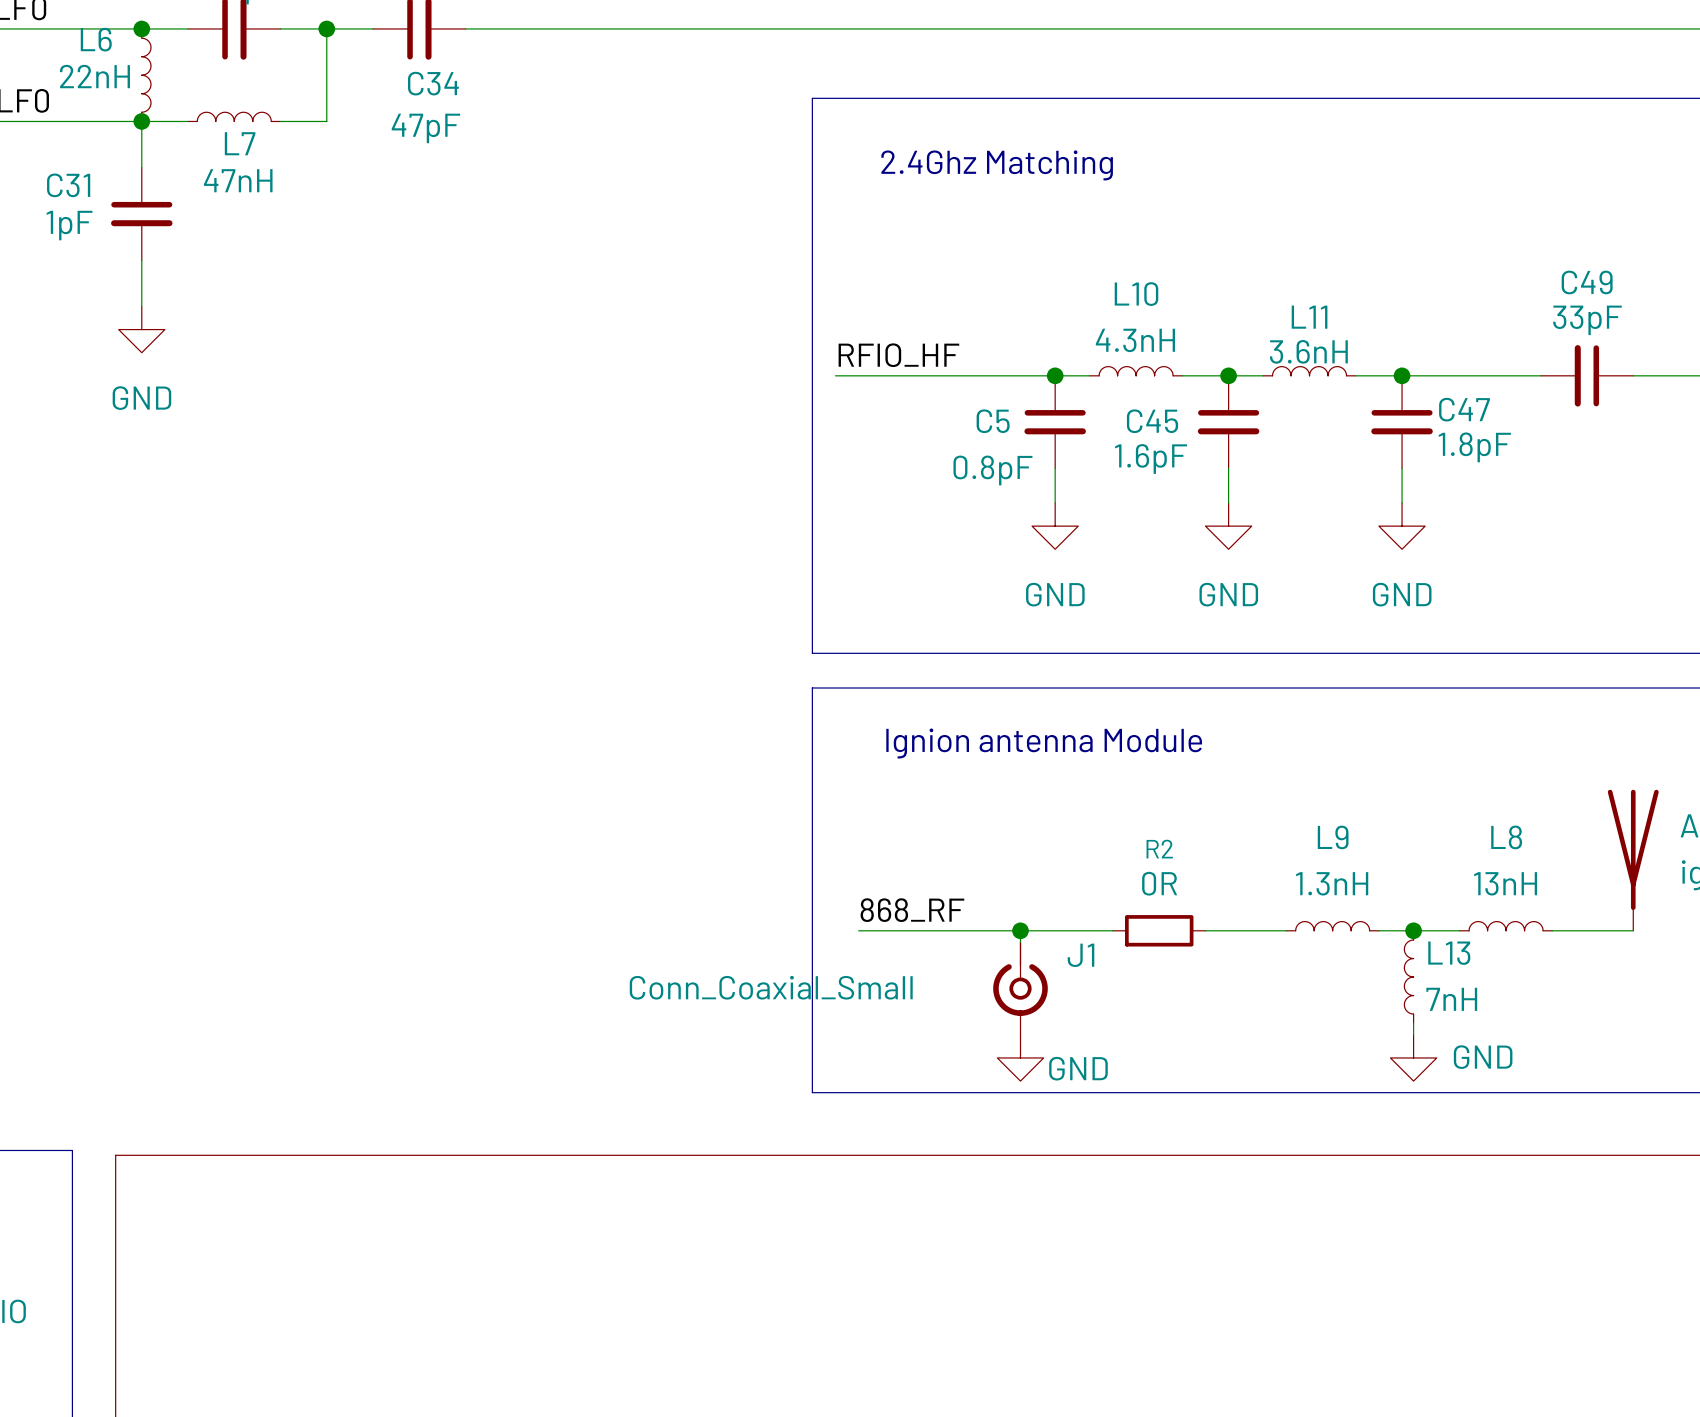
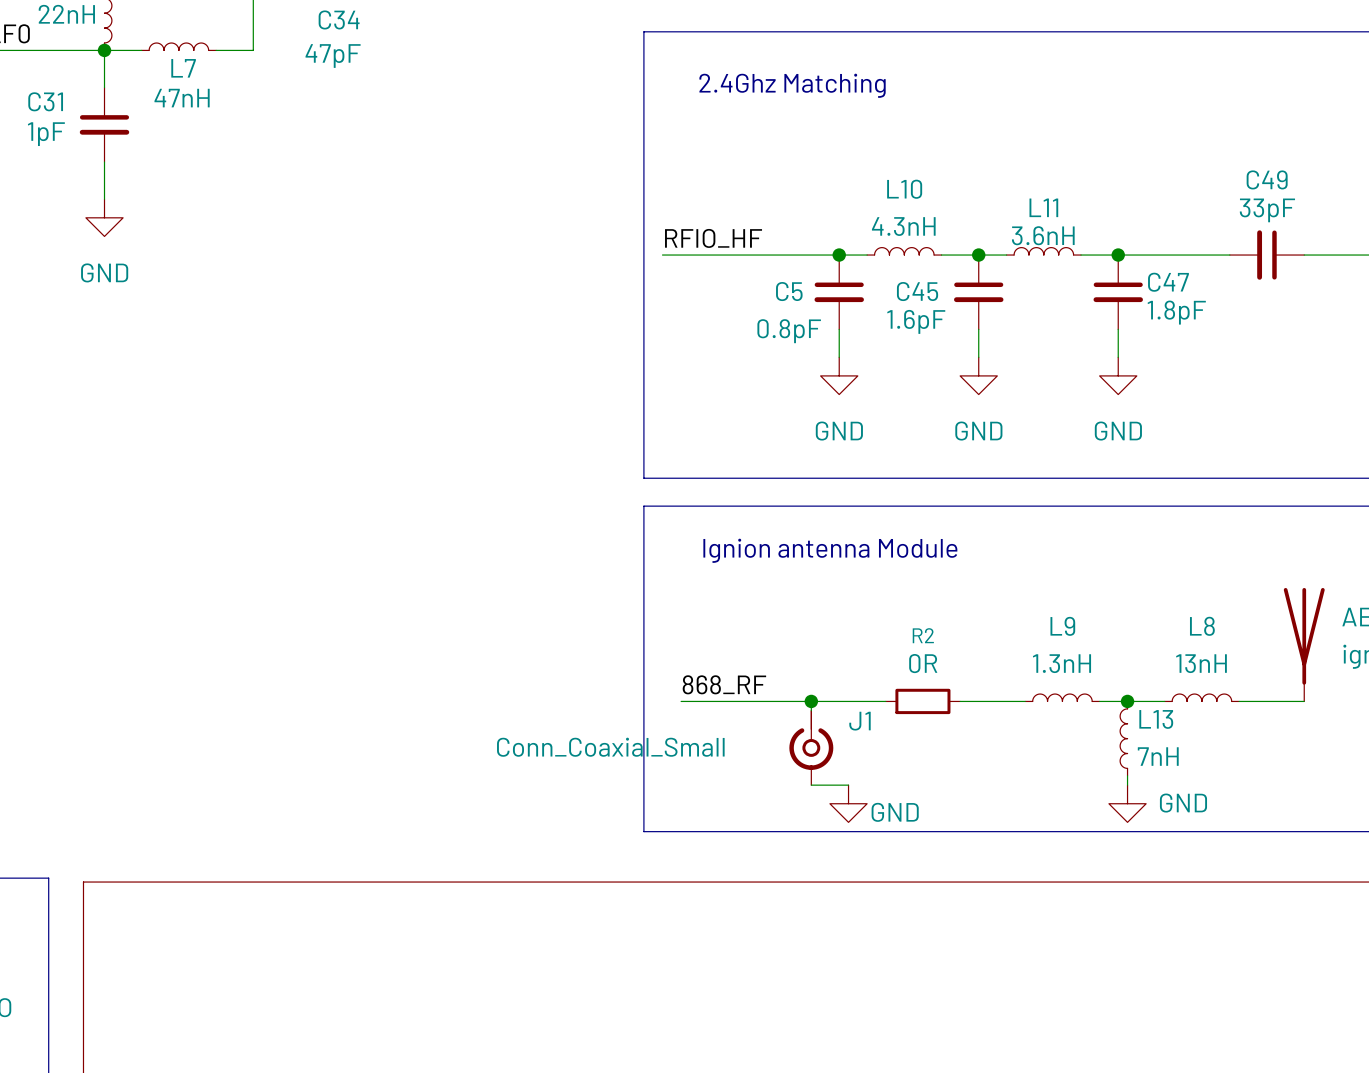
wire: none -> (811, 785) (848, 785)
power symbol position: GND (1020, 1057) -> GND (848, 803)

